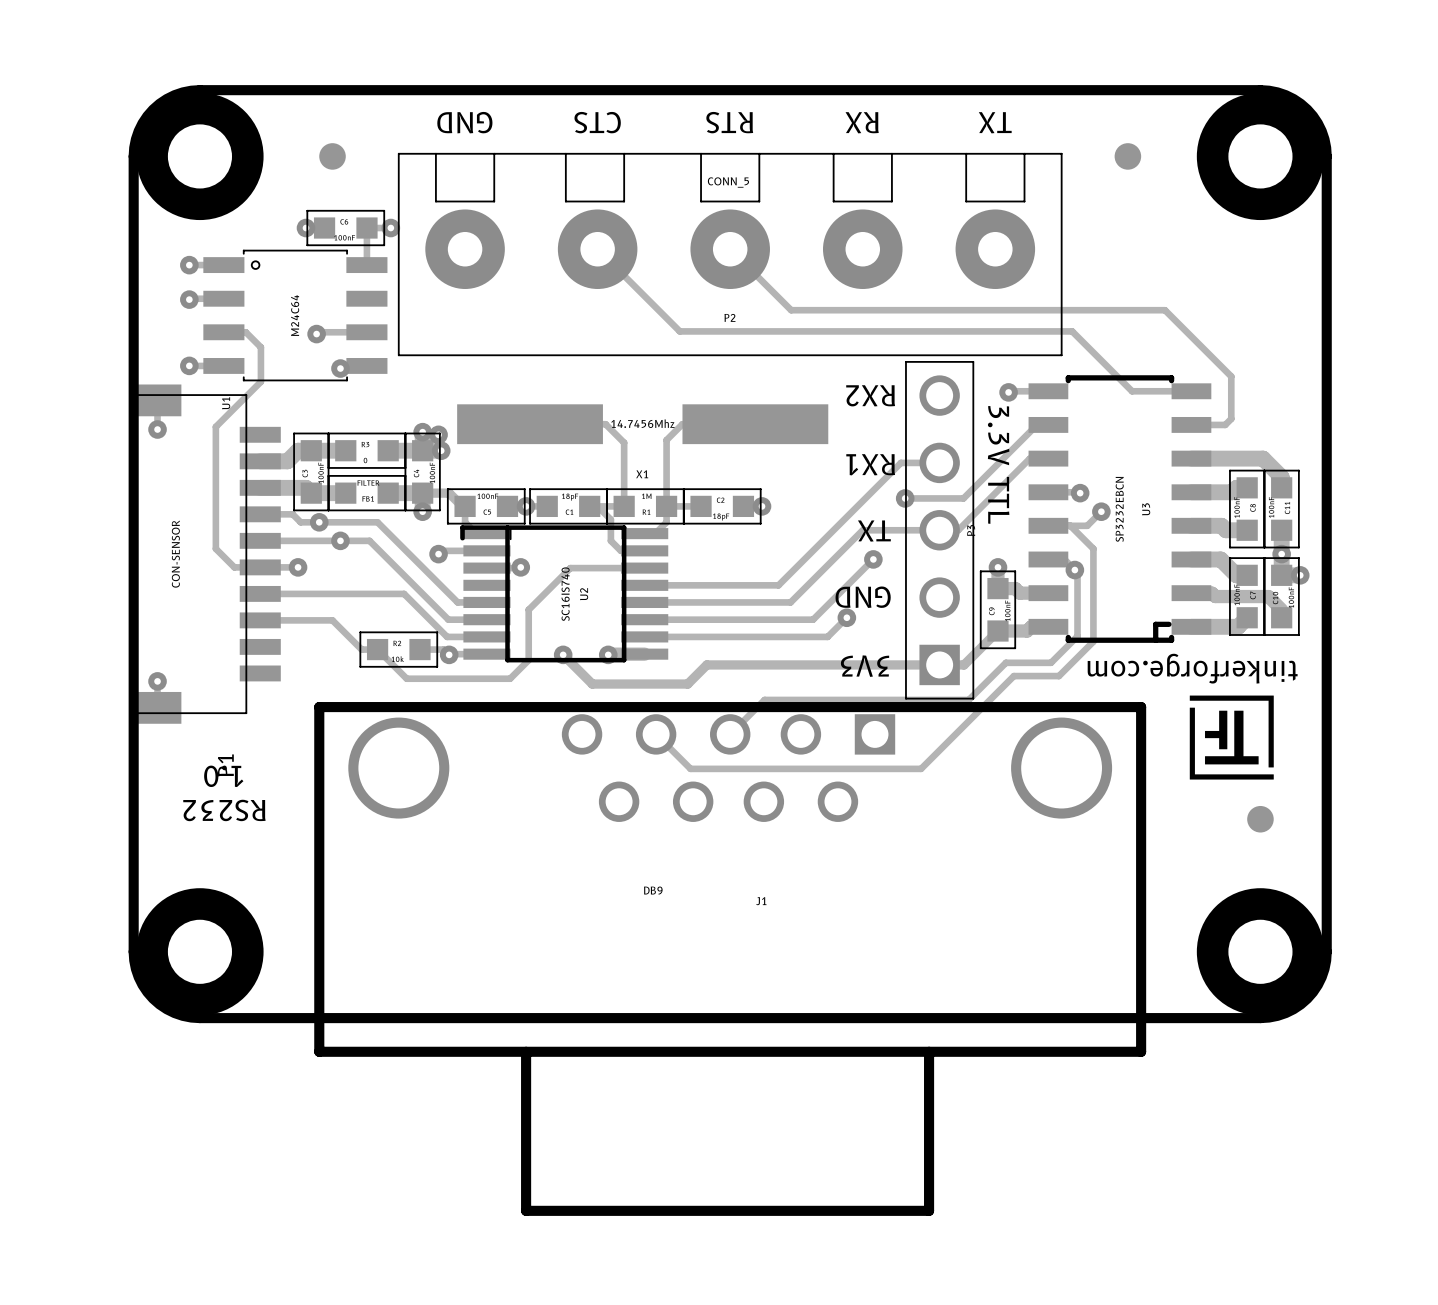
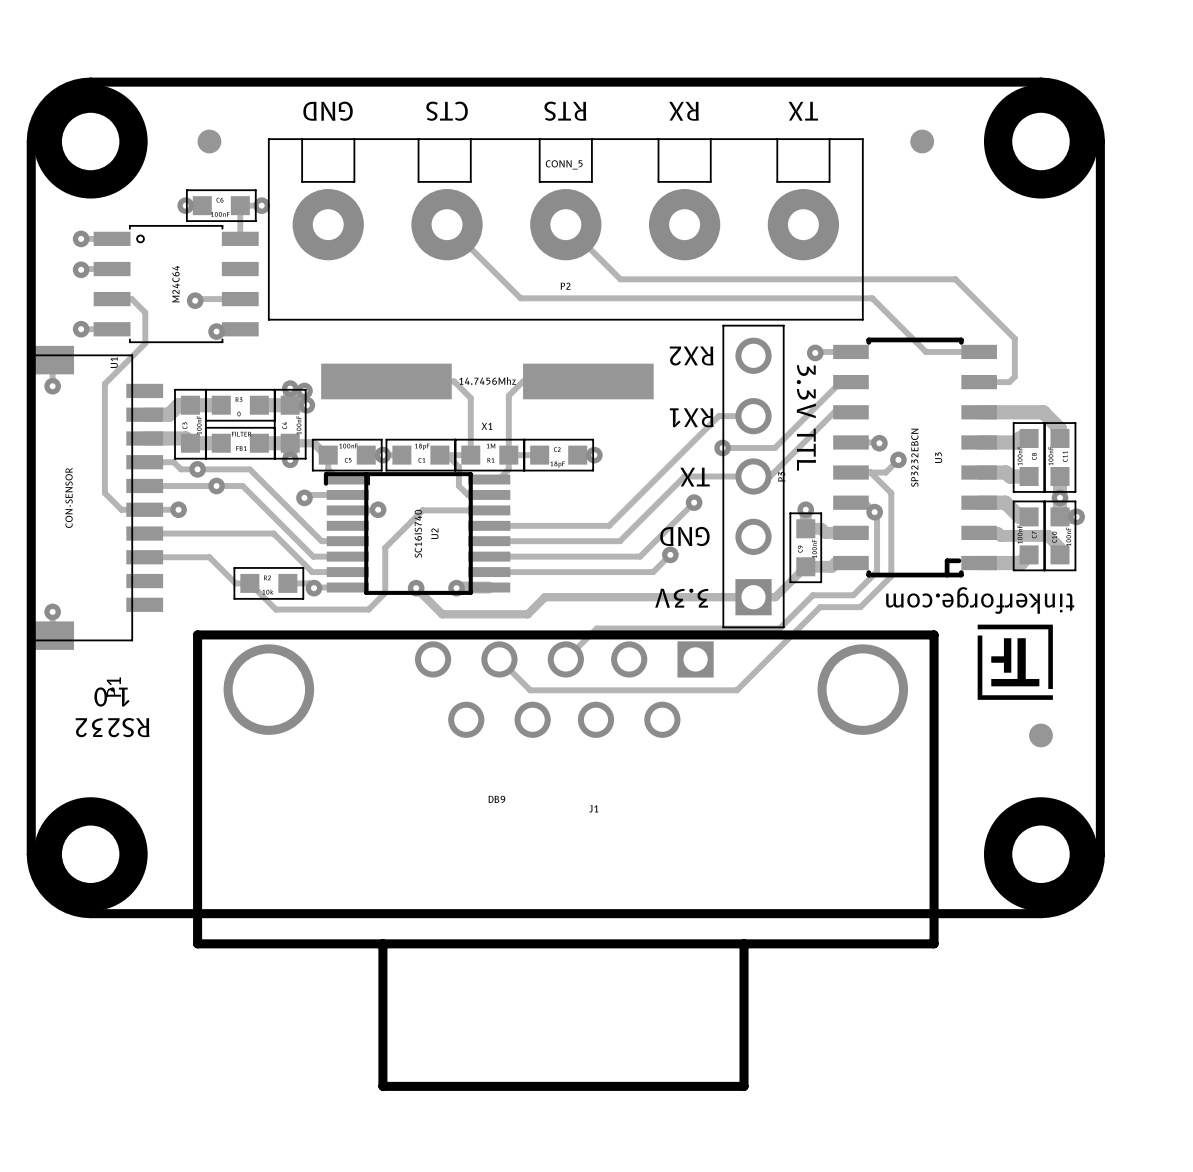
text: 3V3 (865, 666) -> 3.3V (681, 598)

